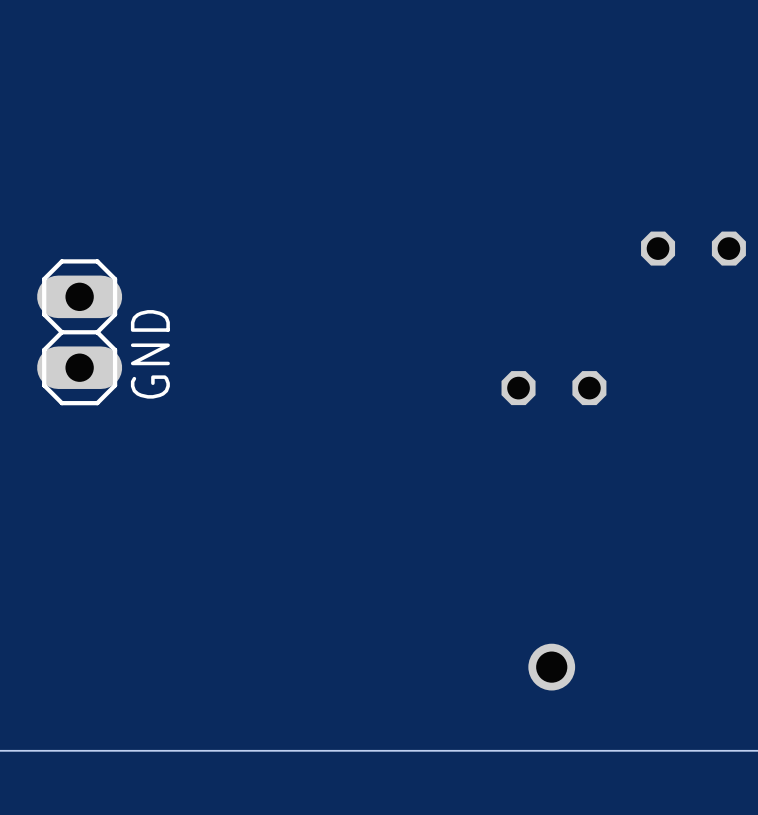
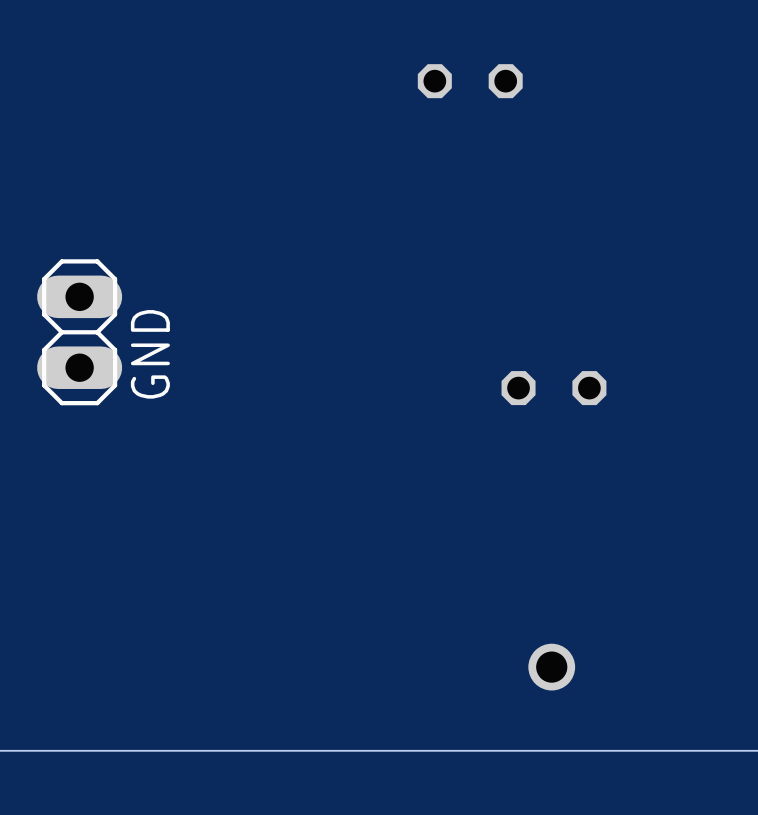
part position: (693, 248) -> (470, 81)

